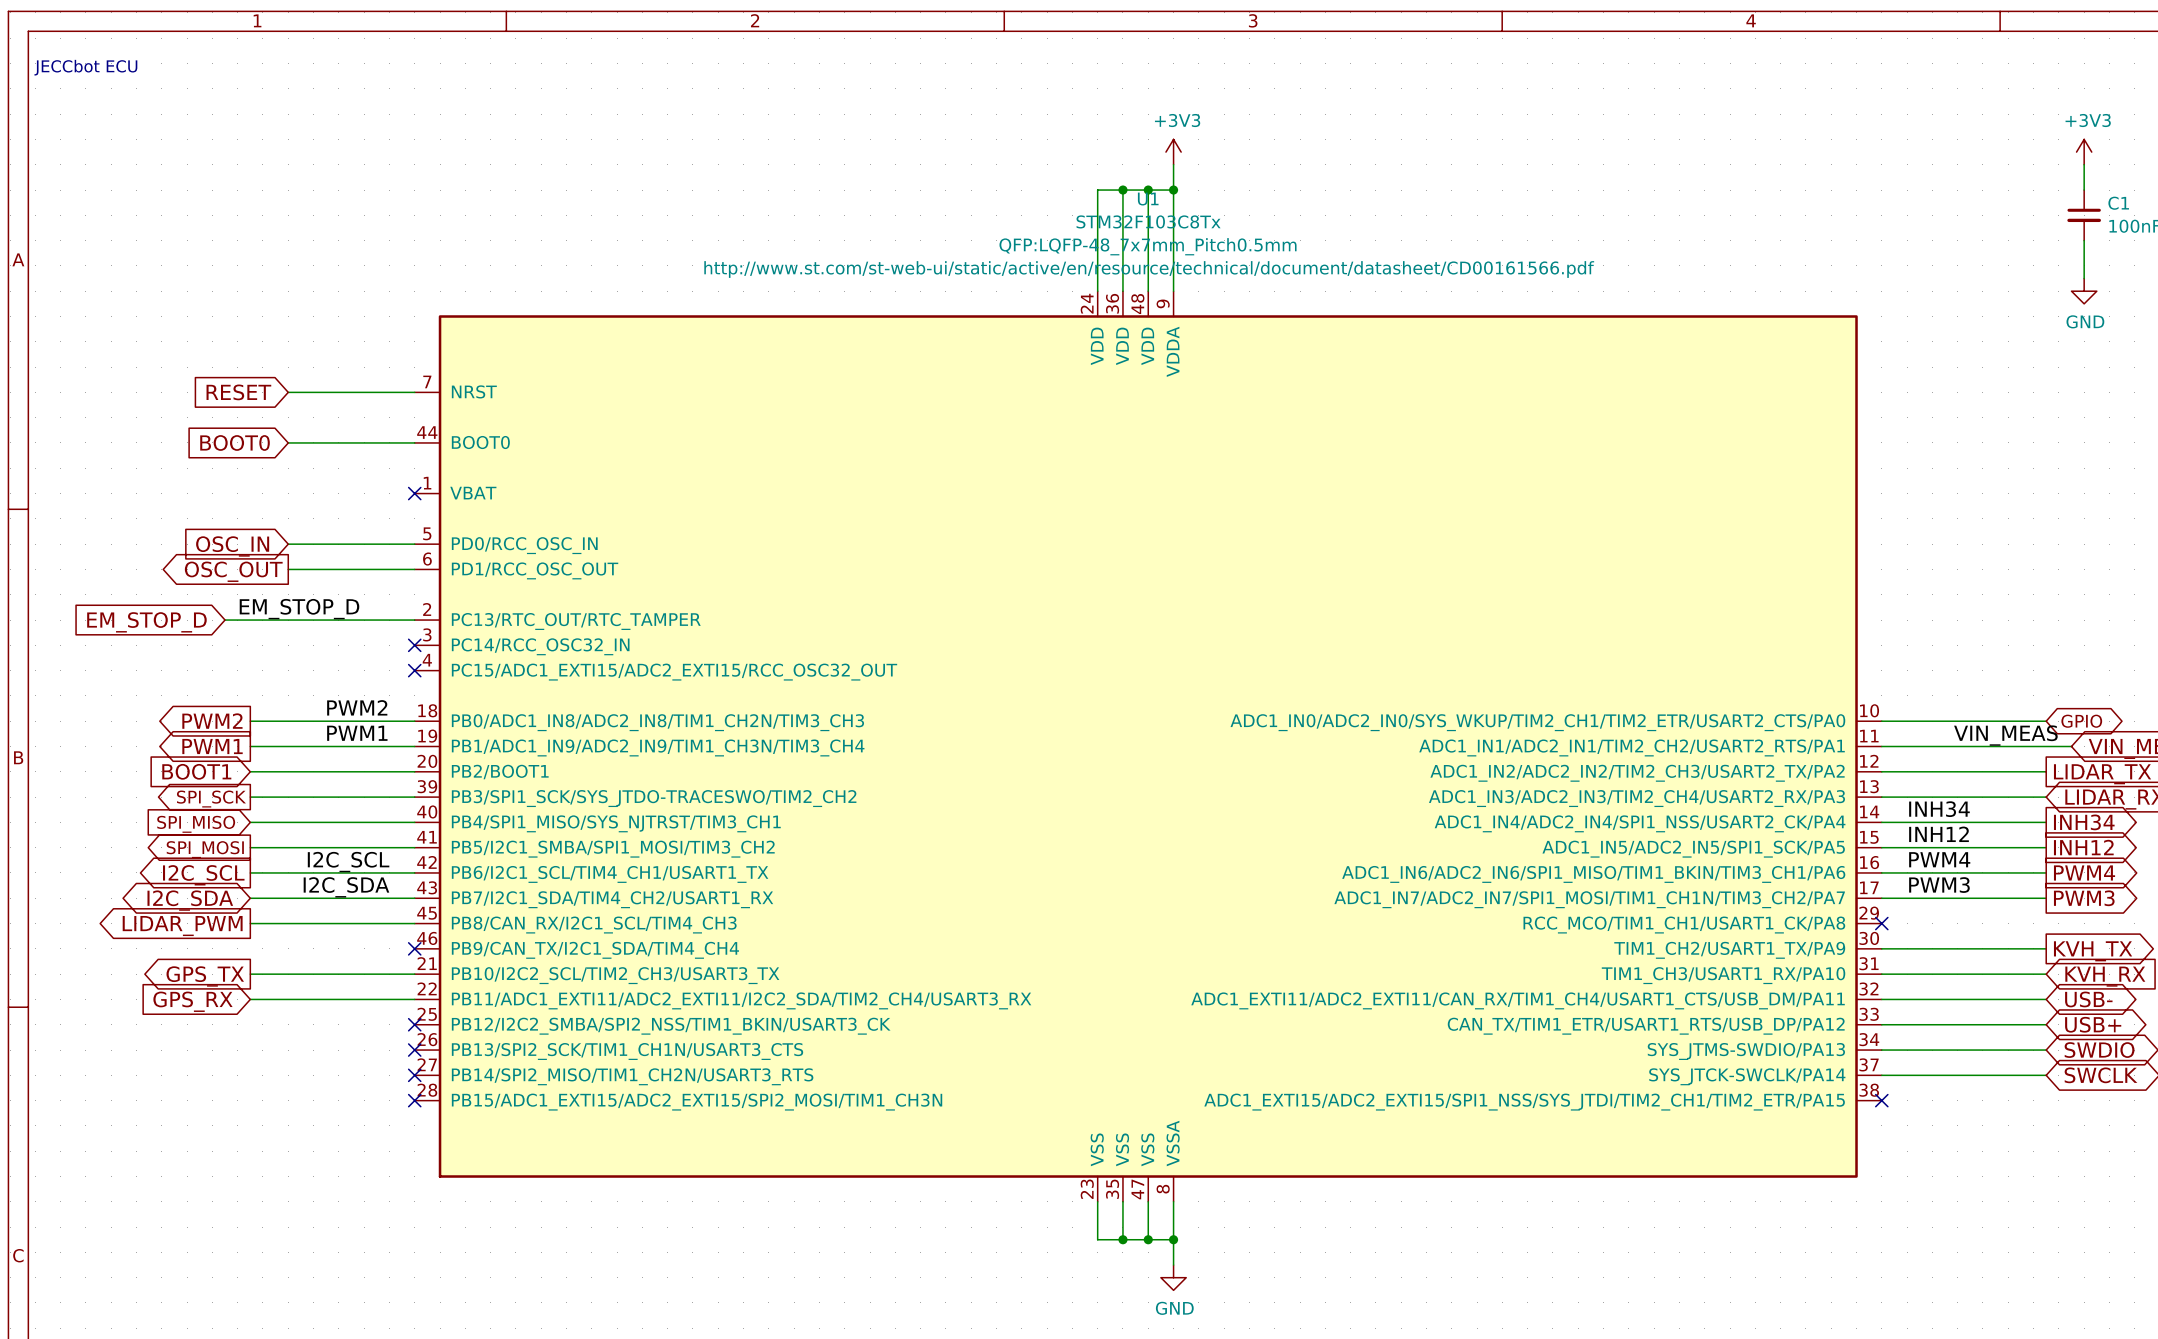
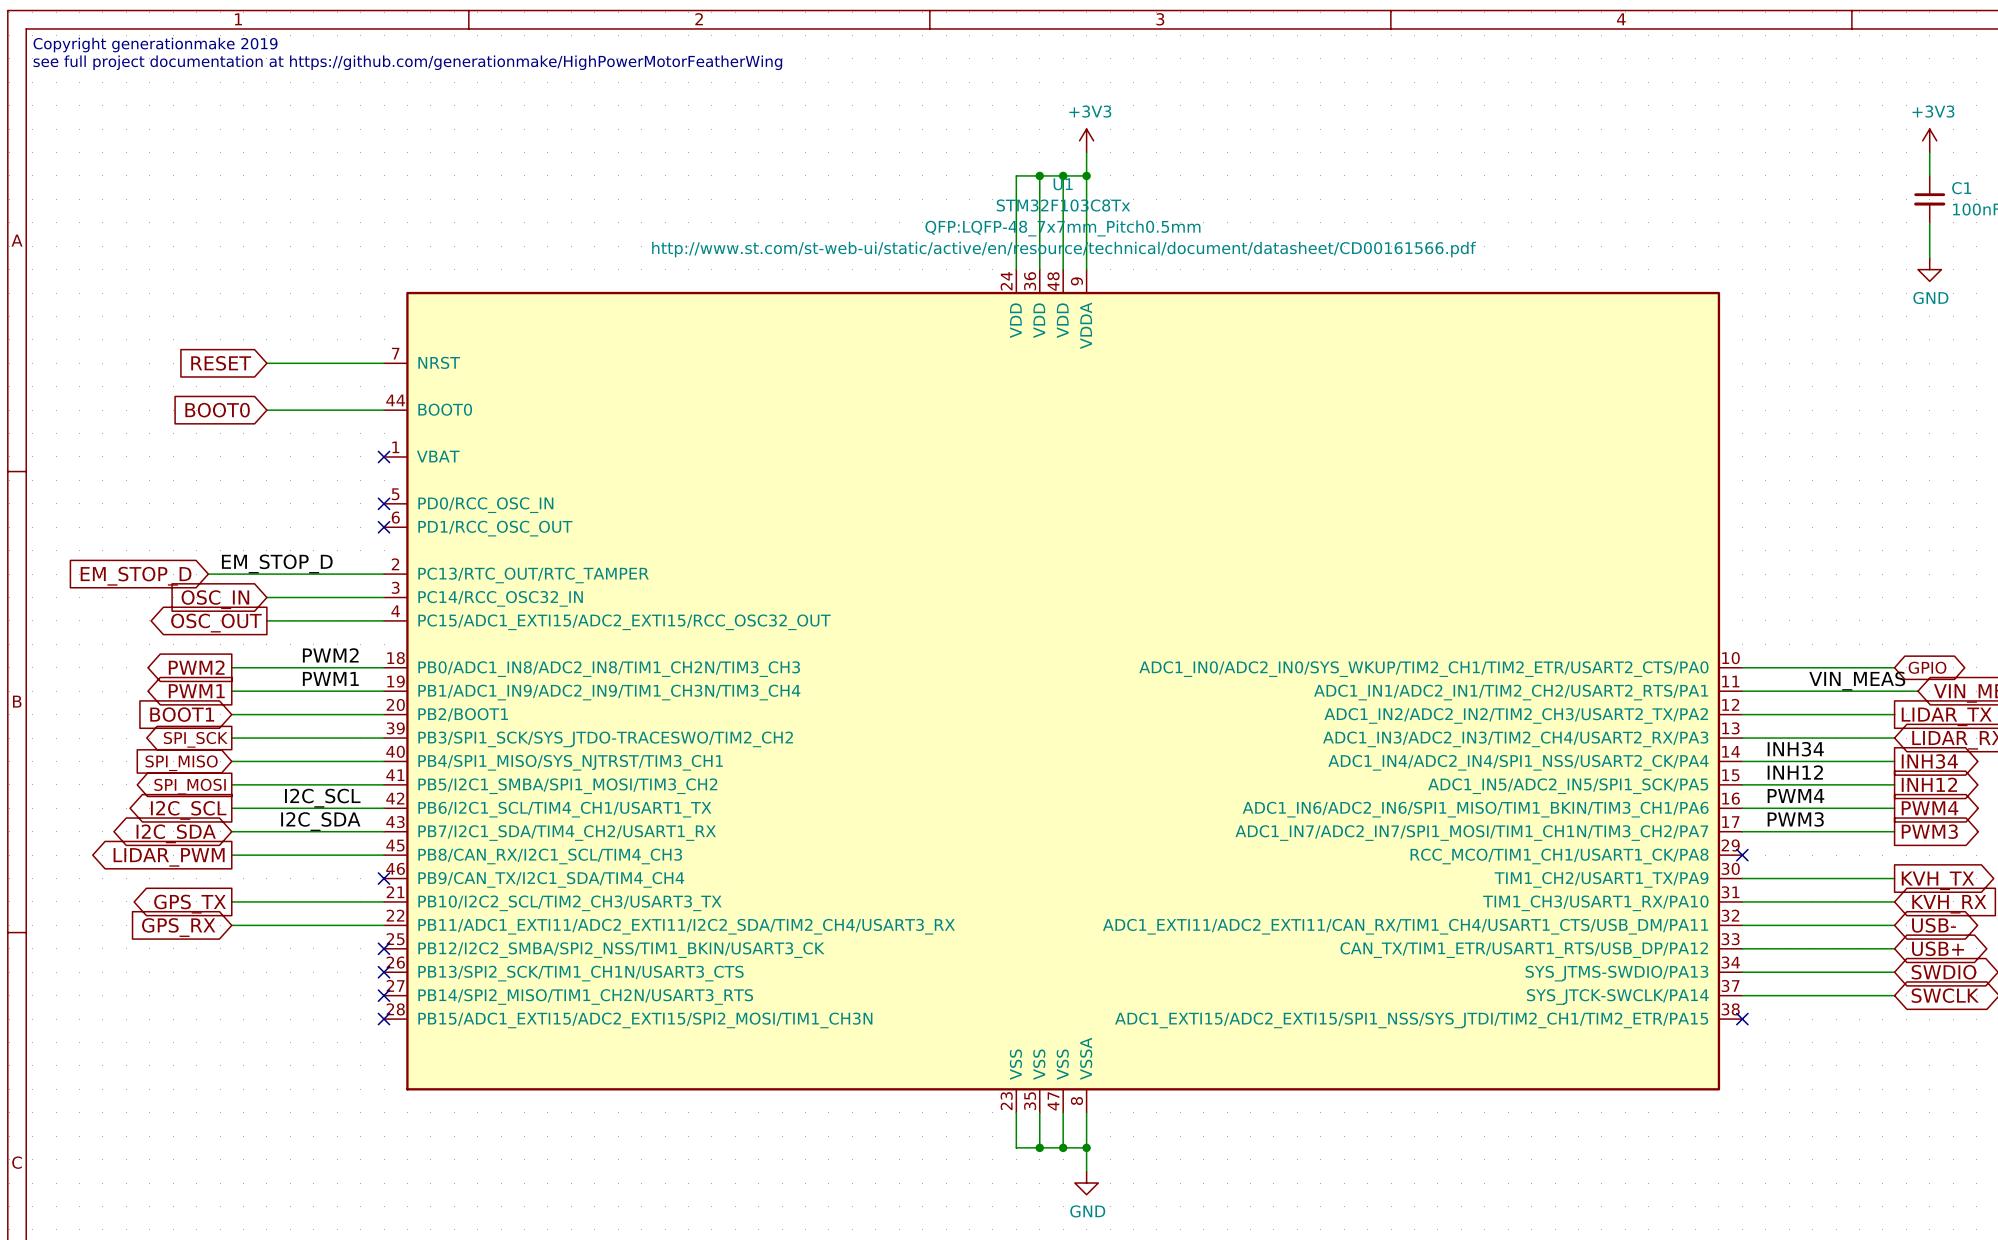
text: none -> Copyright generationmake 2019 (155, 45)
text: JECCbot ECU (85, 67) -> see full project documentation at https://github.com/generationmake/HighPowerMotorFeatherWing (407, 62)
wire: (288, 544) (414, 544) -> (266, 597) (384, 597)
no-connect mark: none -> (384, 503)
global label position: OSC_IN (232, 546) -> OSC_IN (215, 599)
wire: (288, 569) (414, 569) -> (266, 620) (384, 620)
no-connect mark: none -> (384, 527)
global label position: OSC_OUT (233, 571) -> OSC_OUT (216, 623)
no-connect mark: (414, 645) -> none
no-connect mark: (414, 670) -> none

